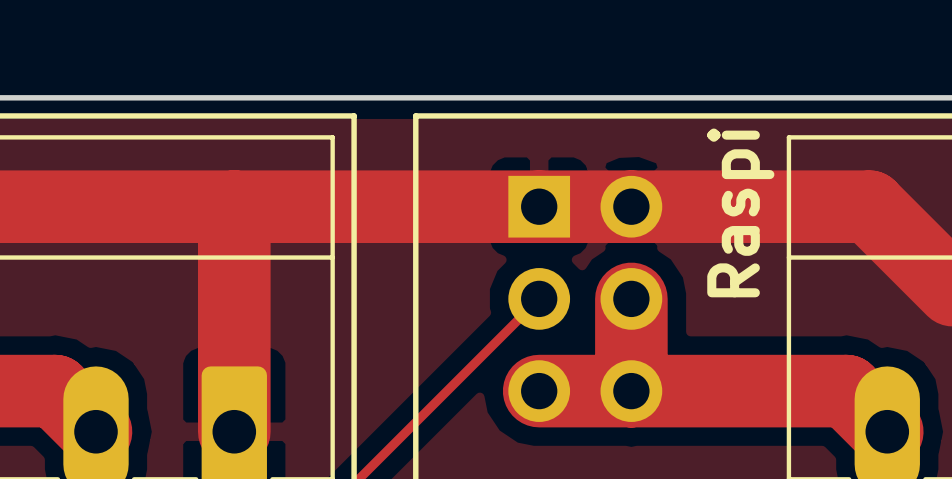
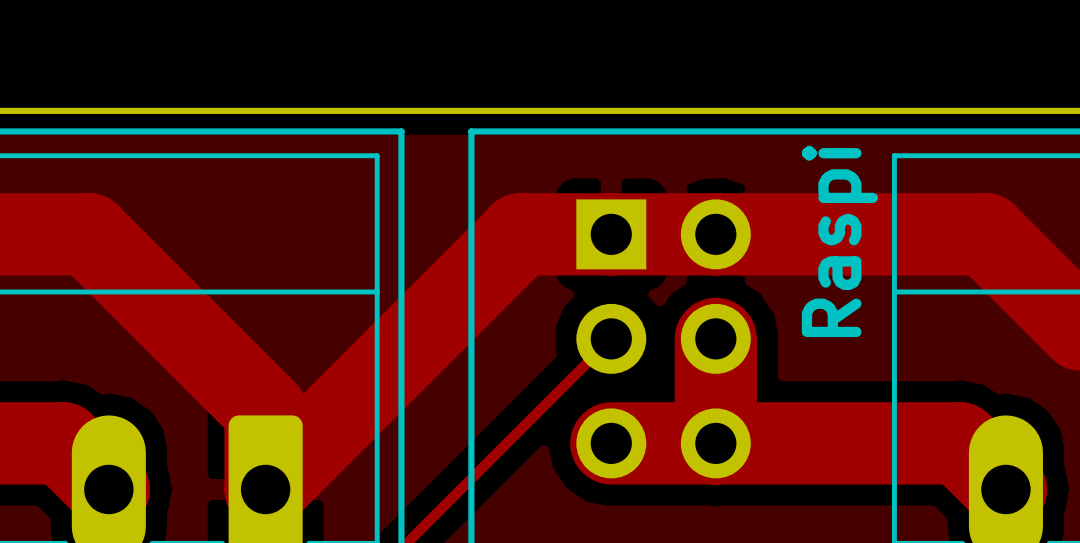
track: (78, 206) (459, 206) -> (265, 489) (520, 234)
track: (234, 206) (234, 362) -> (88, 234) (265, 411)

